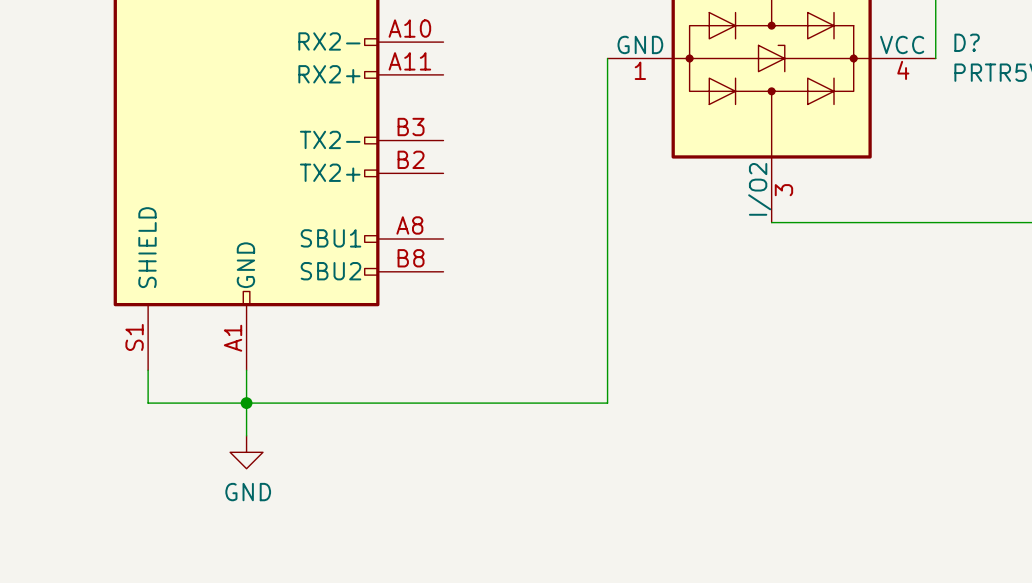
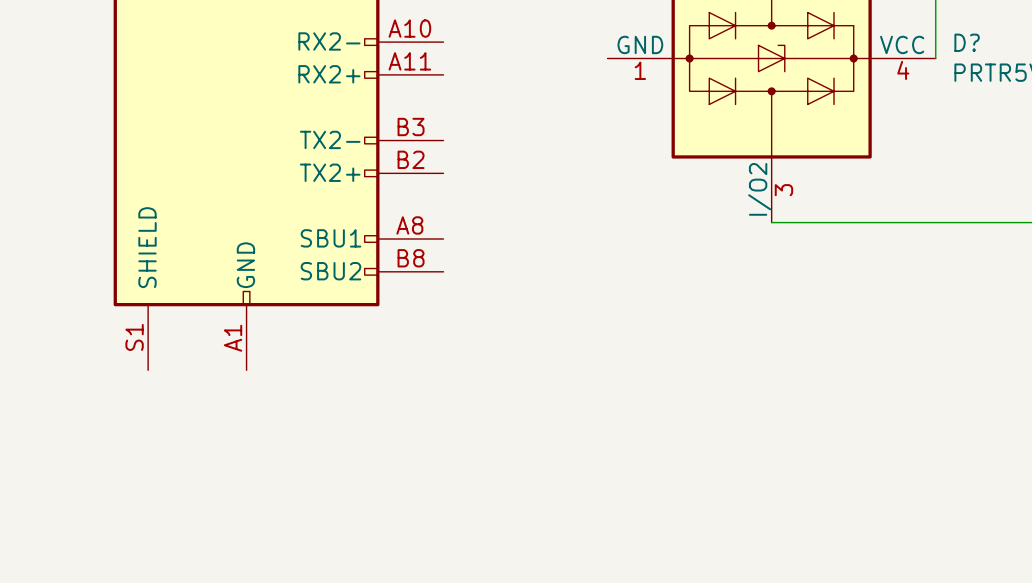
wire: (607, 58) (607, 403) (148, 403) (148, 370) -> none
wire: (246, 370) (246, 435) -> none
junction: (246, 403) -> none
power symbol: GND (246, 452) -> none

